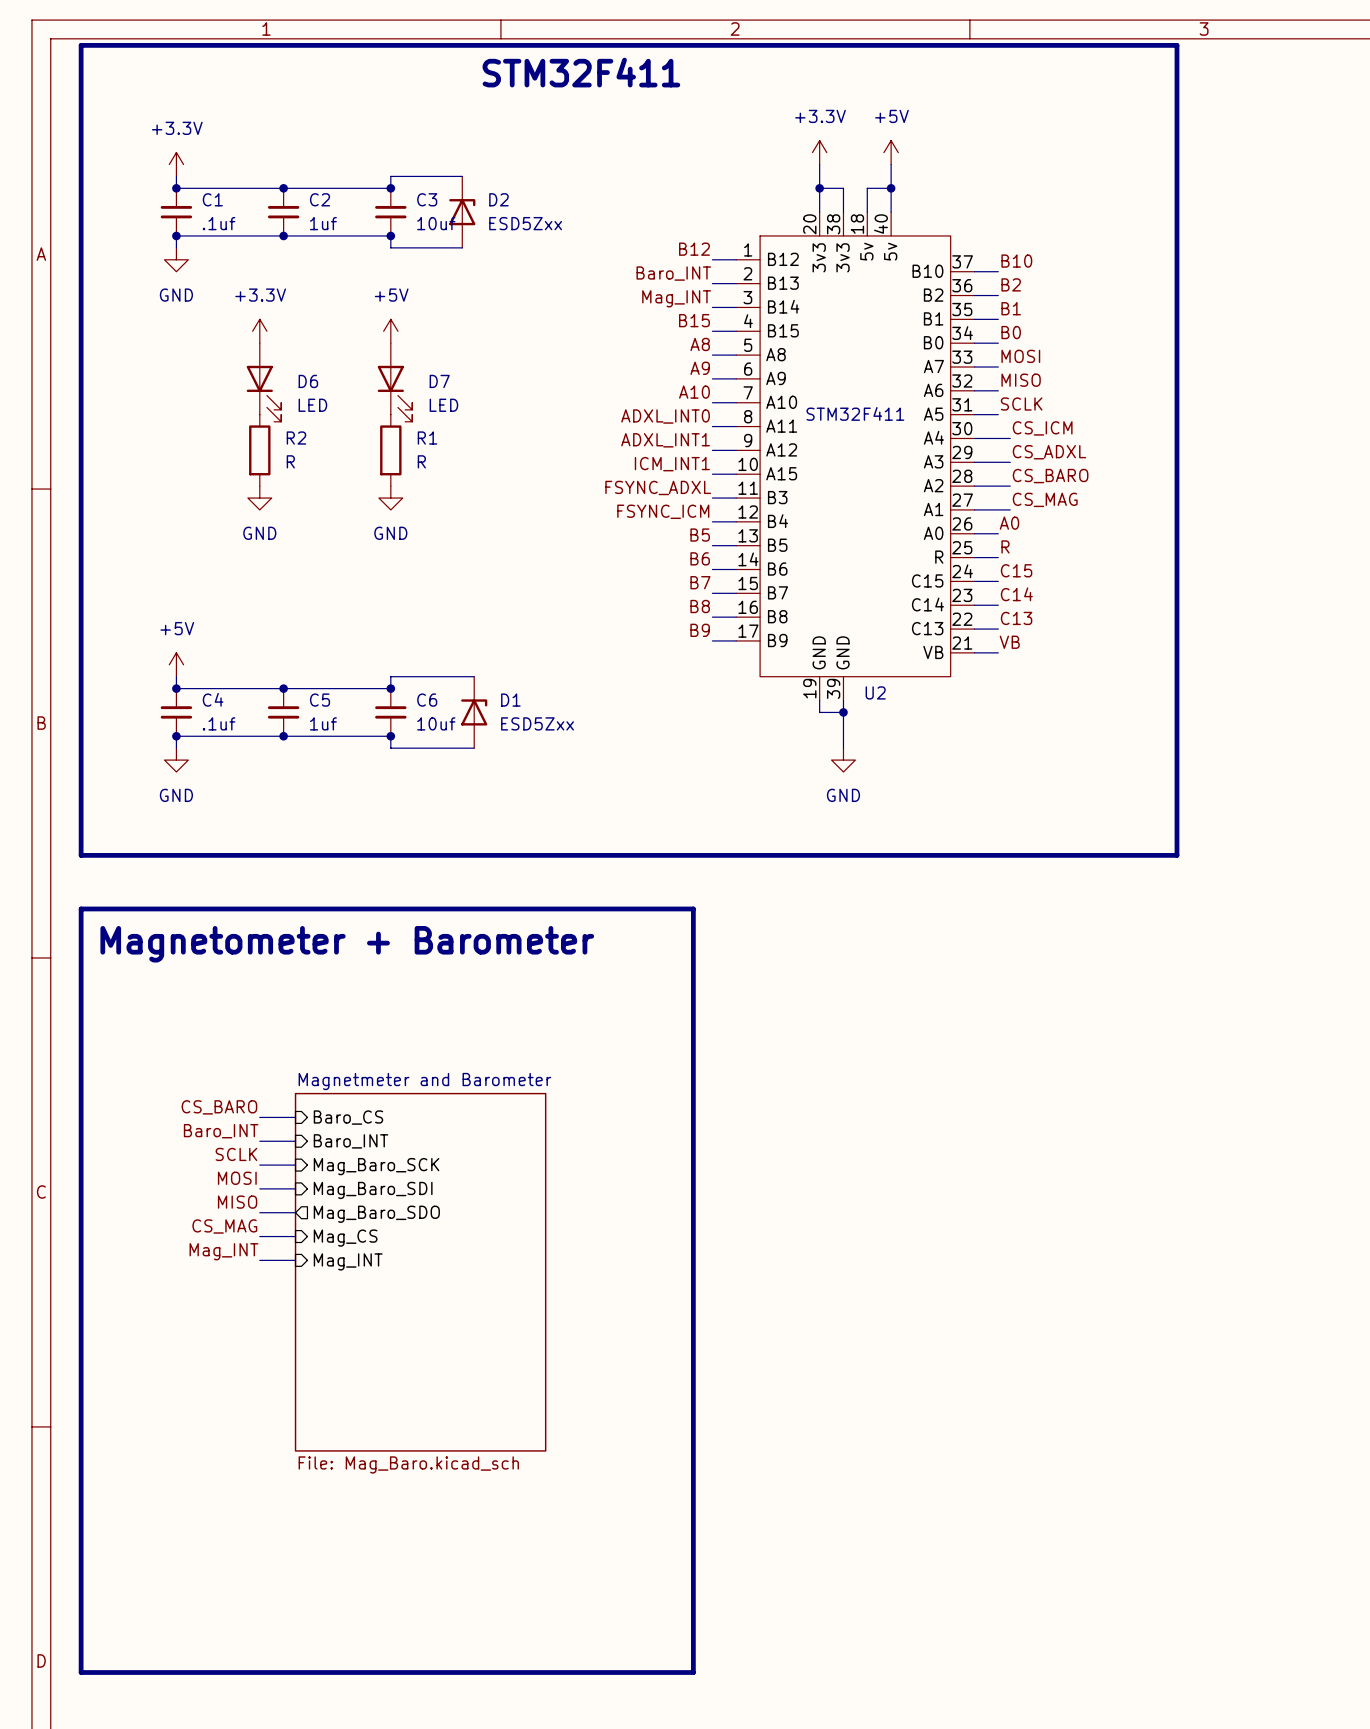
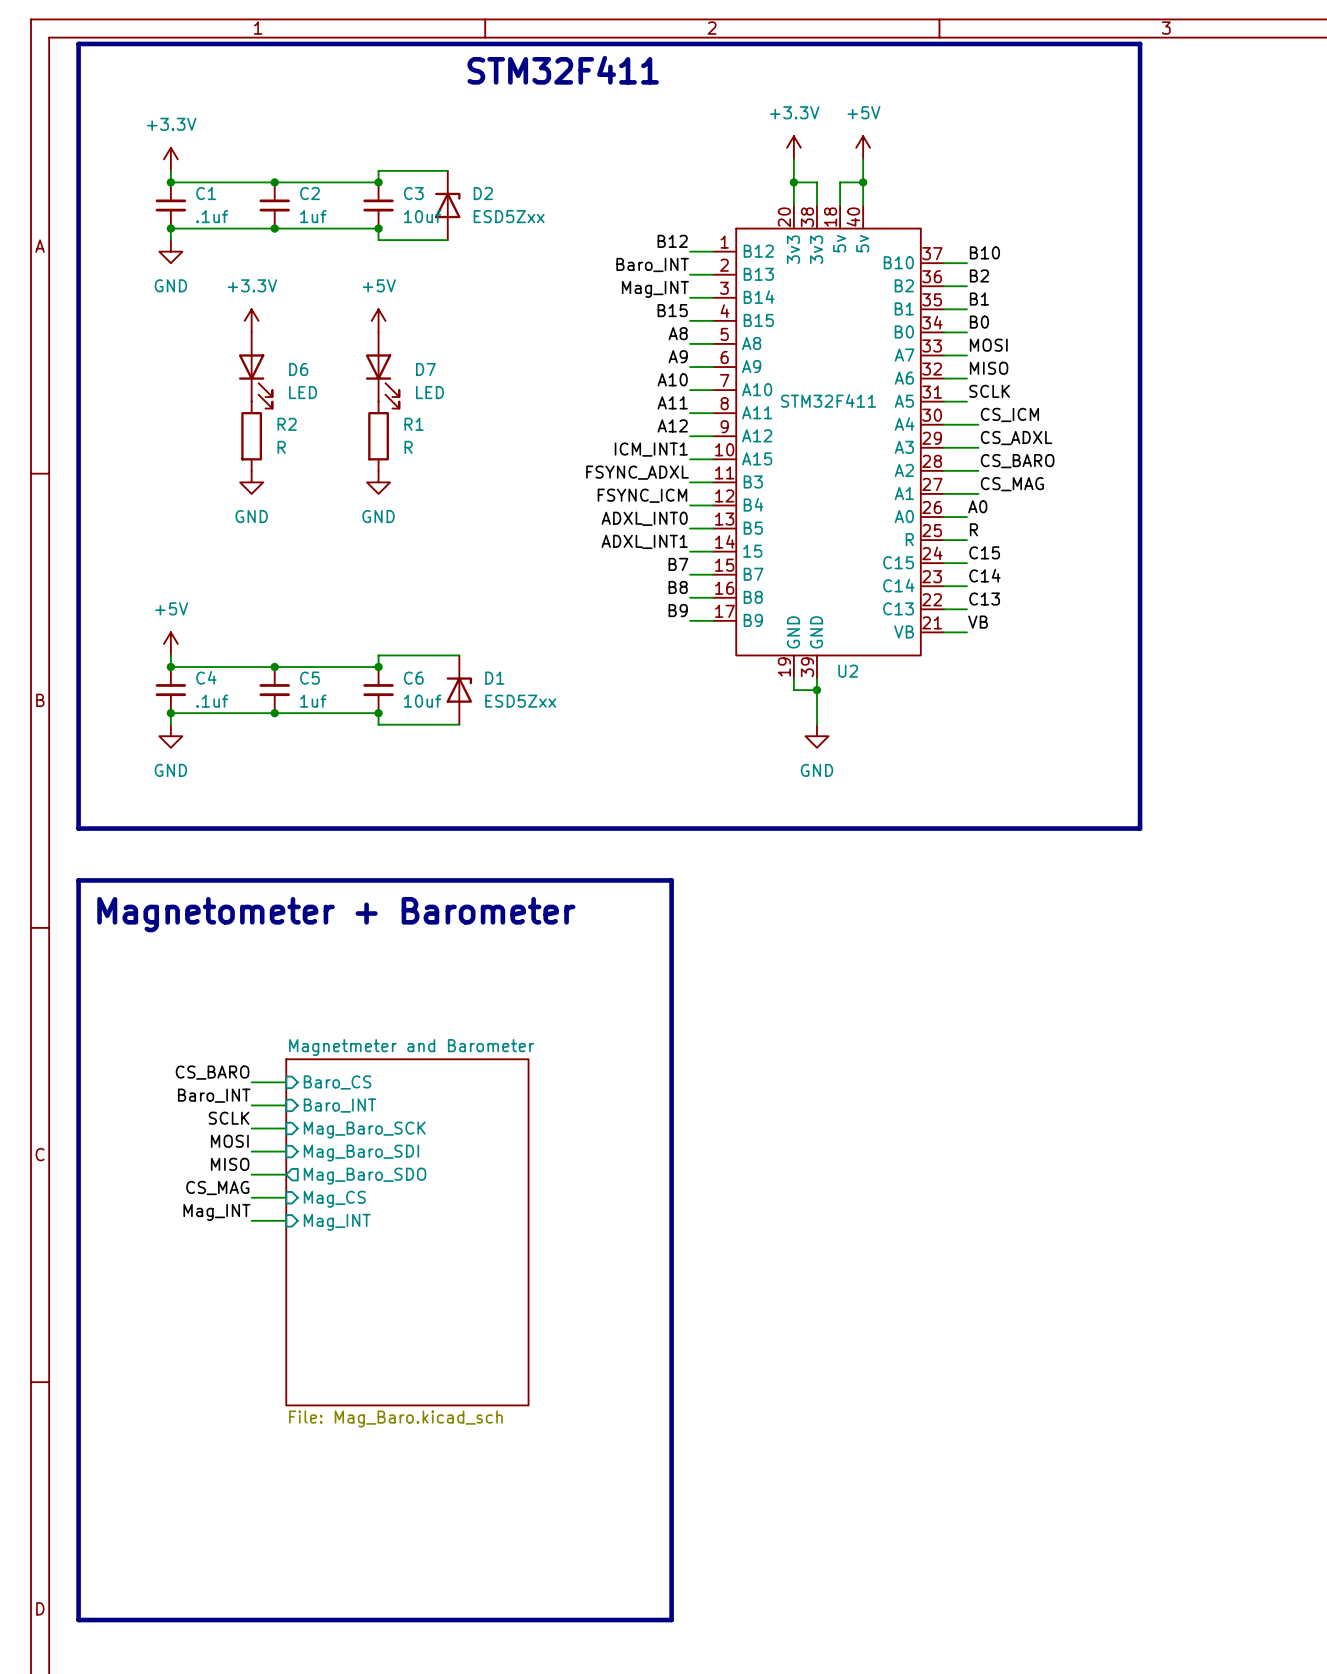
label: ADXL_INT0 (665, 416) -> A11 (672, 402)
label: ADXL_INT1 (665, 440) -> A12 (672, 425)
label: B5 (700, 535) -> ADXL_INT0 (644, 518)
label: B6 (700, 558) -> ADXL_INT1 (644, 541)
U2 pin name: B6 (777, 569) -> 15 (752, 551)

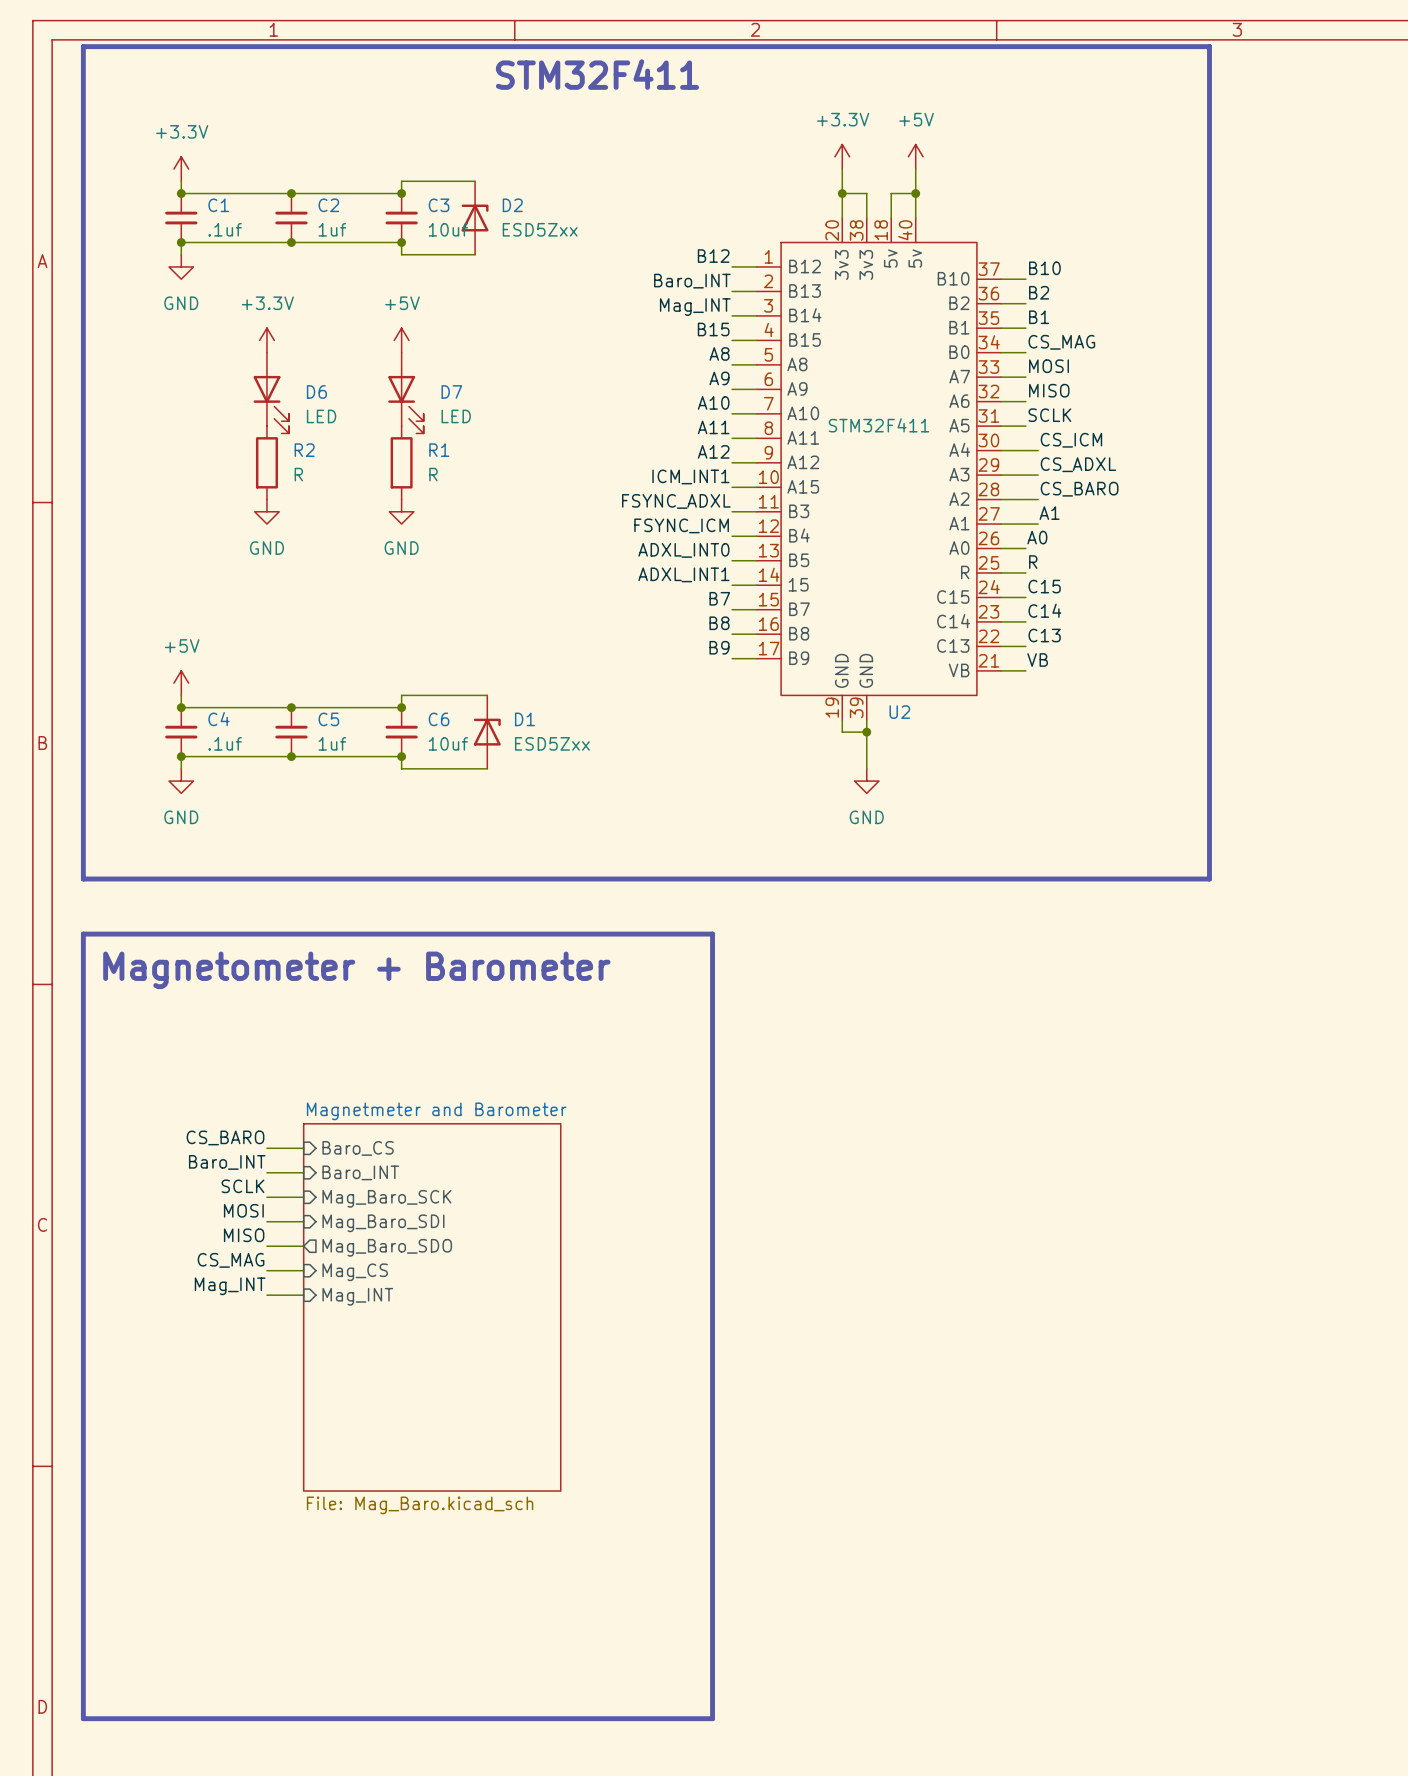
label: B0 (979, 322) -> CS_MAG (1061, 342)
label: CS_MAG (1012, 484) -> A1 (1049, 513)

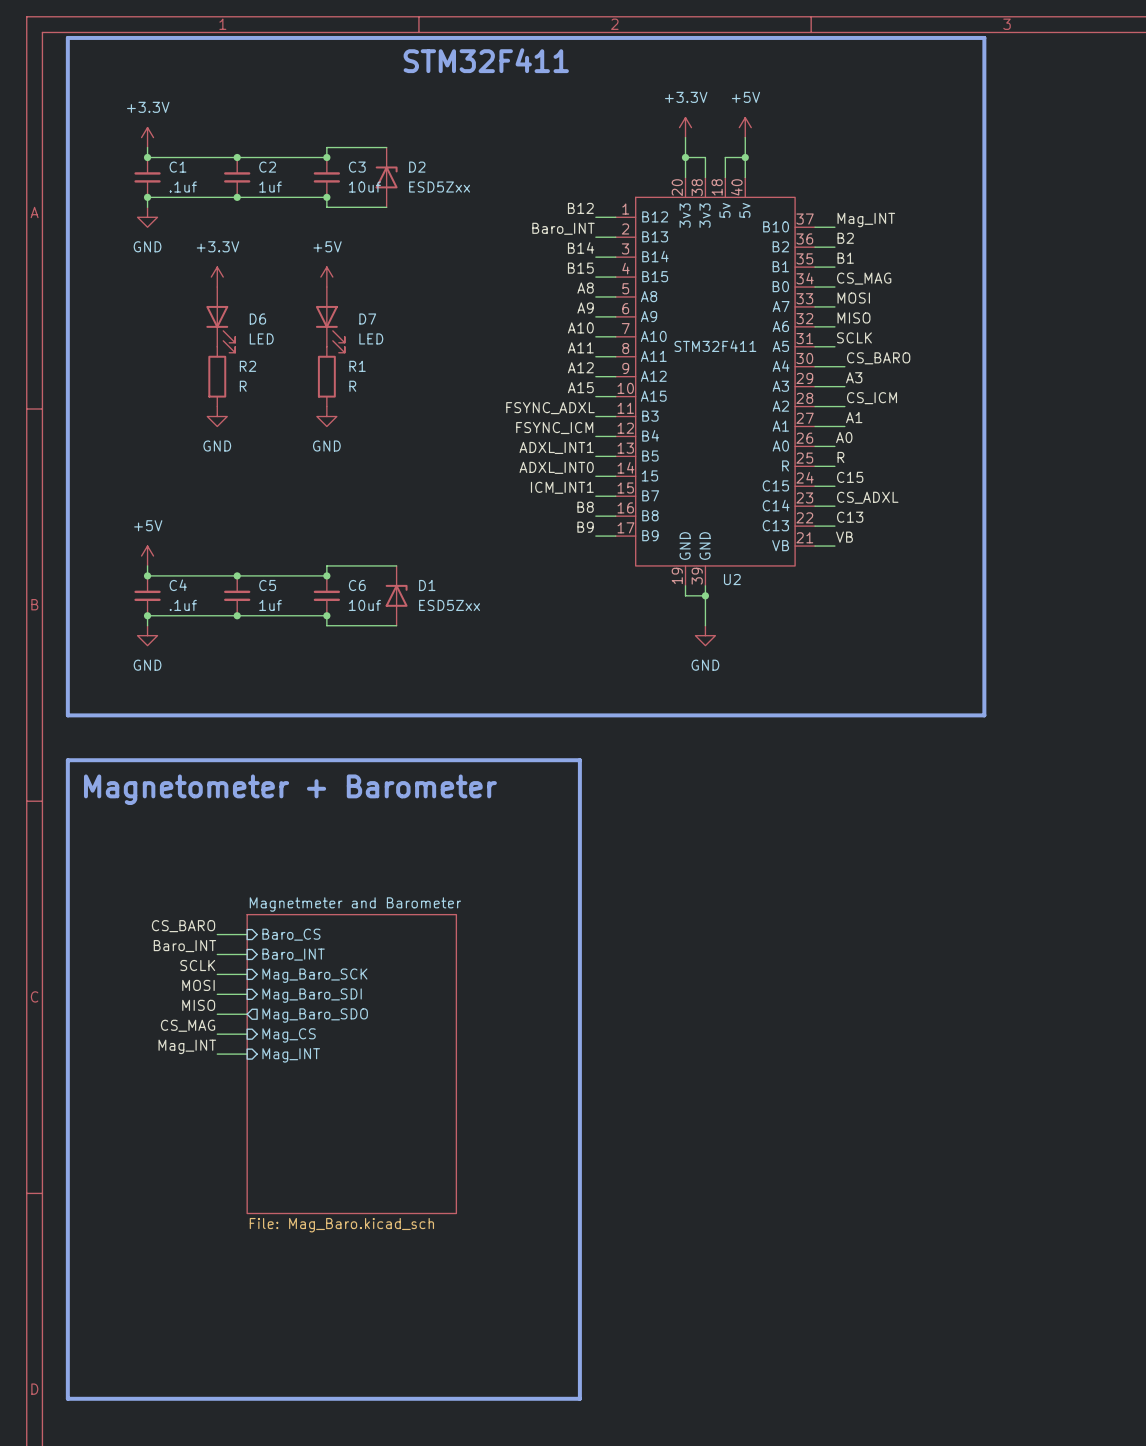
label: B10 (1044, 268) -> Mag_INT (866, 220)
label: Mag_INT (695, 307) -> B14 (581, 248)
label: CS_ICM (1071, 440) -> CS_BARO (878, 358)
label: CS_ADXL (1078, 464) -> A3 (854, 377)
label: ICM_INT1 (690, 476) -> A15 (580, 387)
label: CS_BARO (1079, 489) -> CS_ICM (872, 398)
label: ADXL_INT0 (683, 550) -> ADXL_INT1 (556, 447)
label: ADXL_INT1 (683, 574) -> ADXL_INT0 (556, 467)
label: B7 (719, 598) -> ICM_INT1 (562, 487)
label: C14 (1044, 610) -> CS_ADXL (867, 497)

